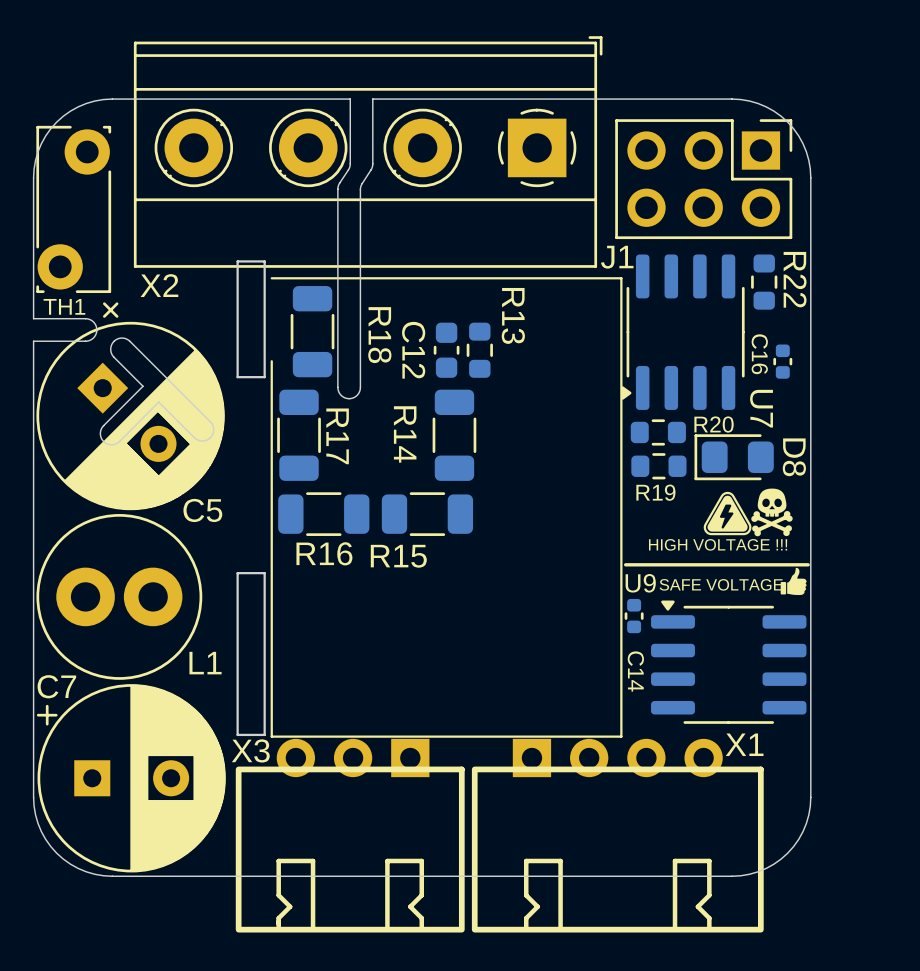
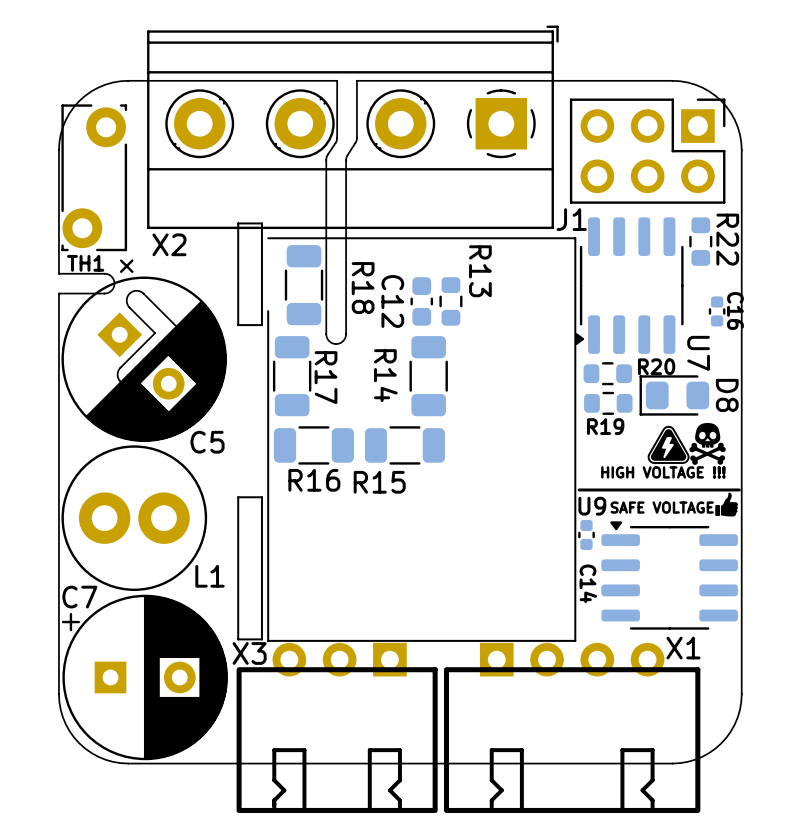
C16 name position: C16 (759, 354) -> C16 (735, 310)

